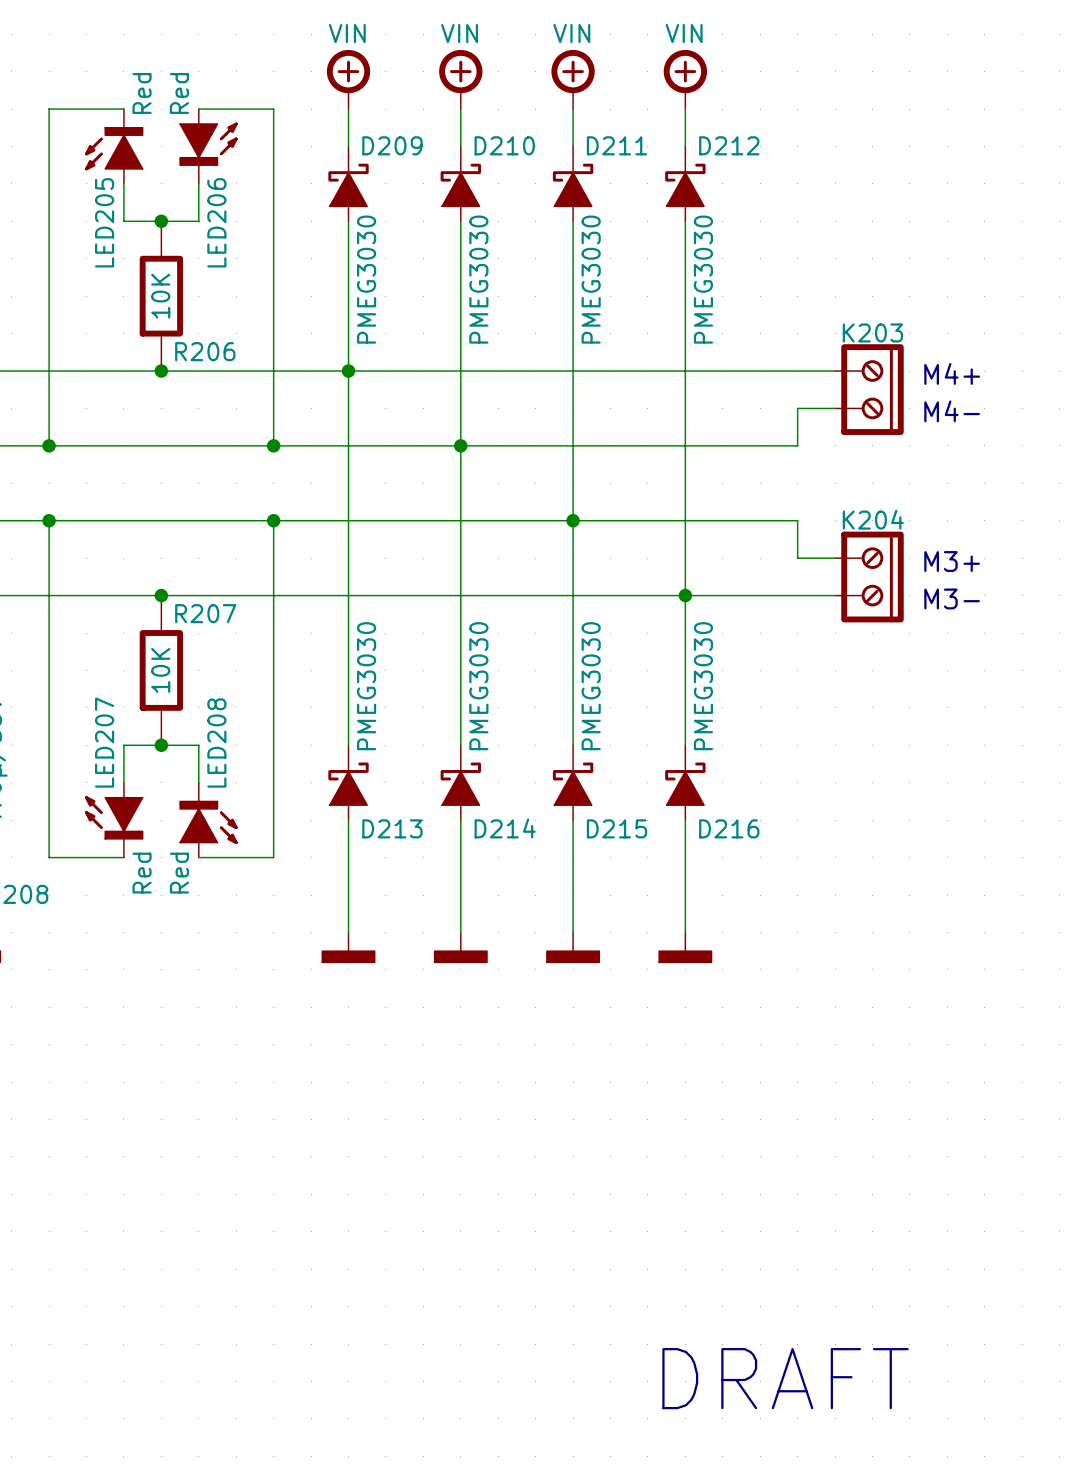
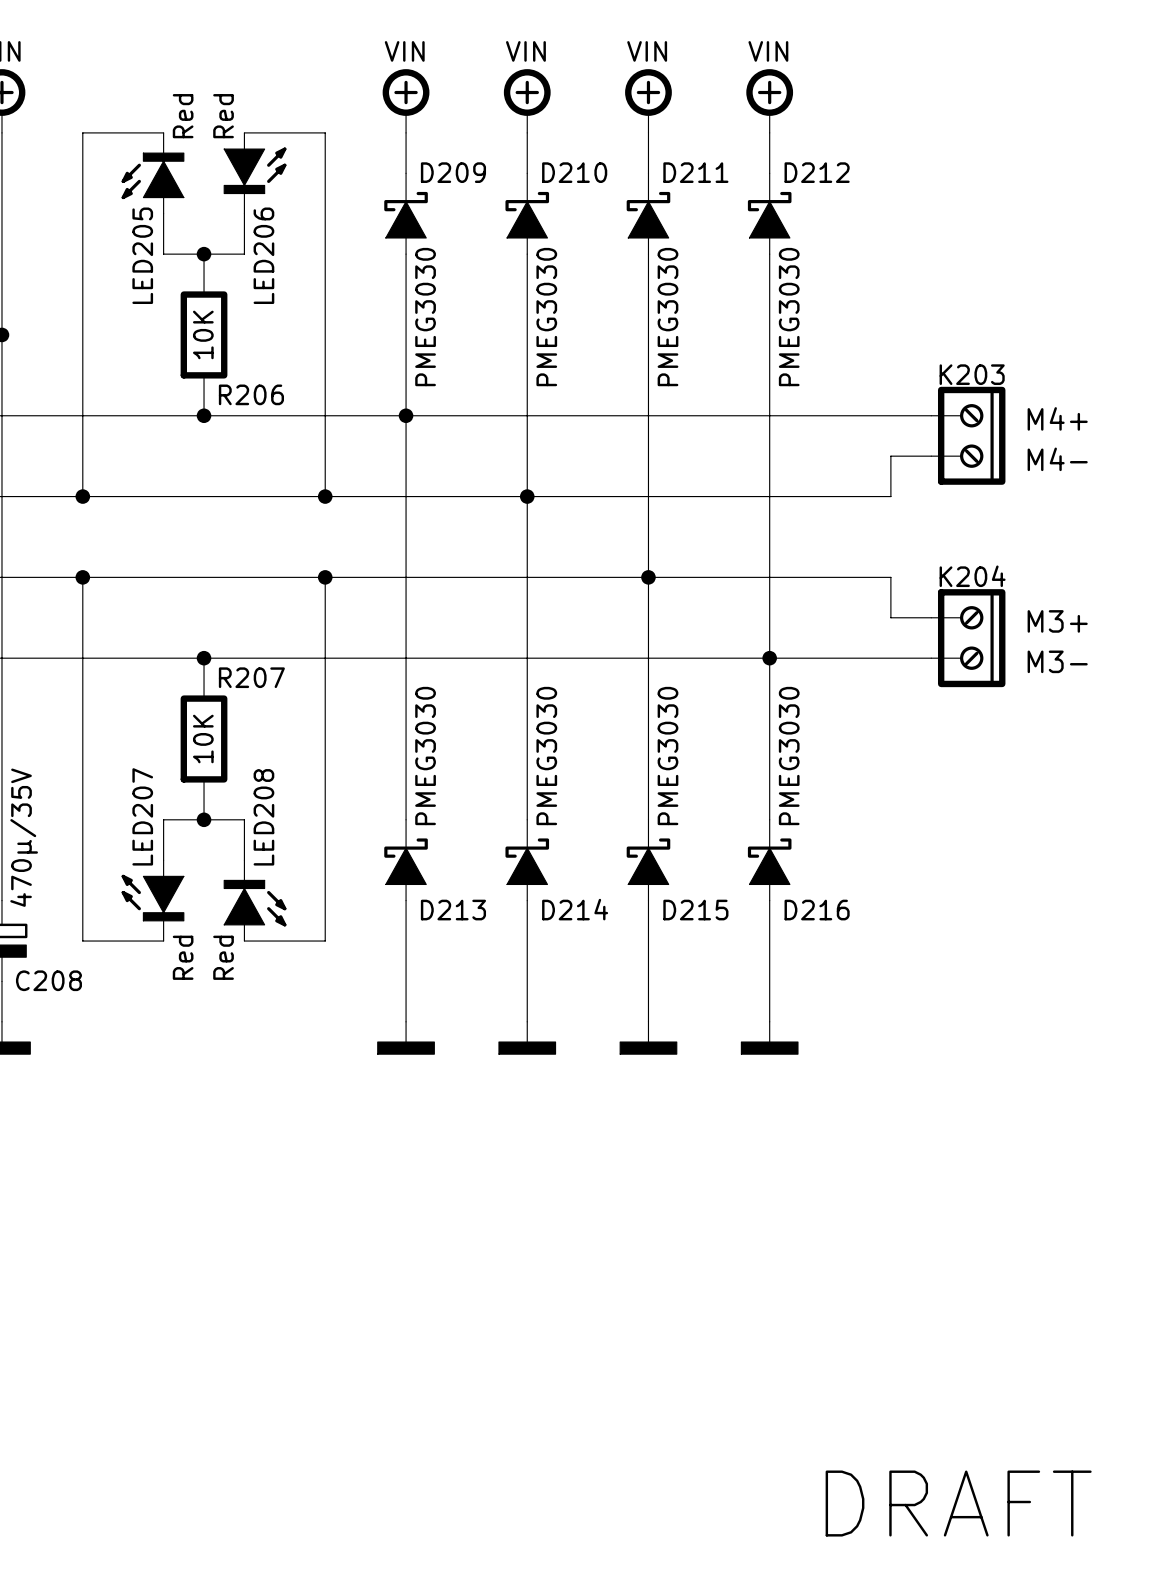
text position: DRAFT (785, 1378) -> DRAFT (958, 1503)

